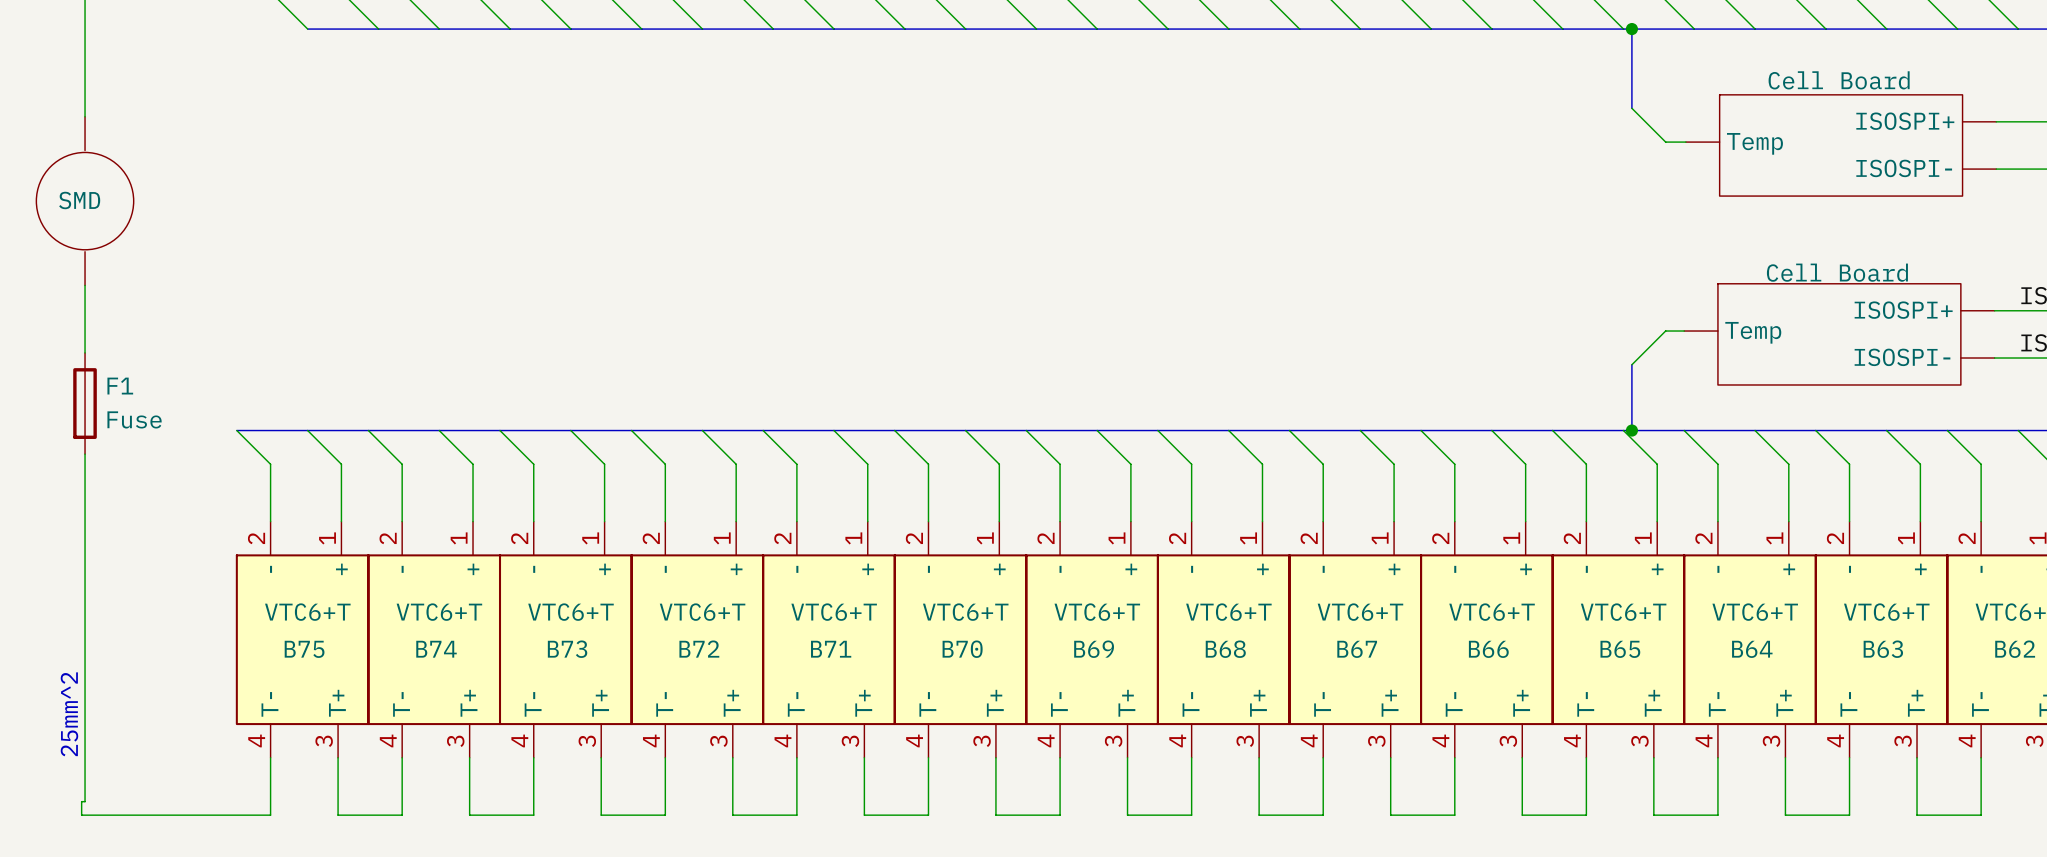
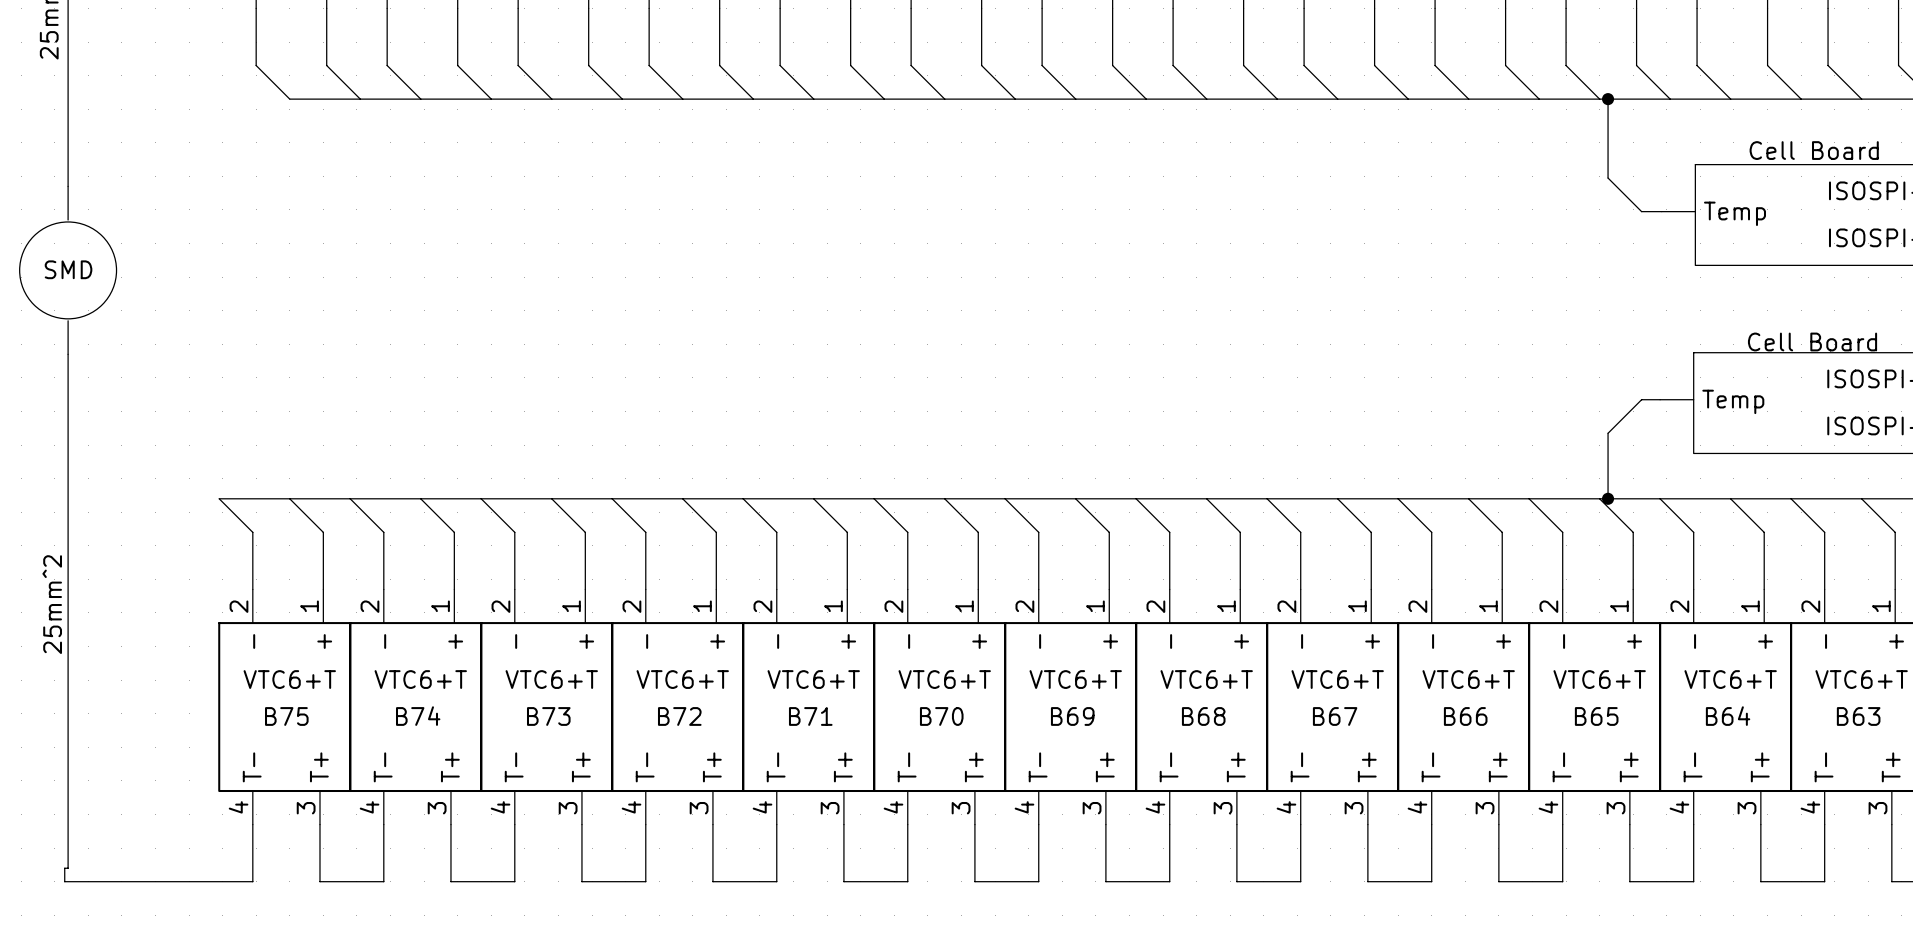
F1: Fuse (85, 403) -> none
text position: 25mm^2 (69, 714) -> 25mm^2 (52, 604)

